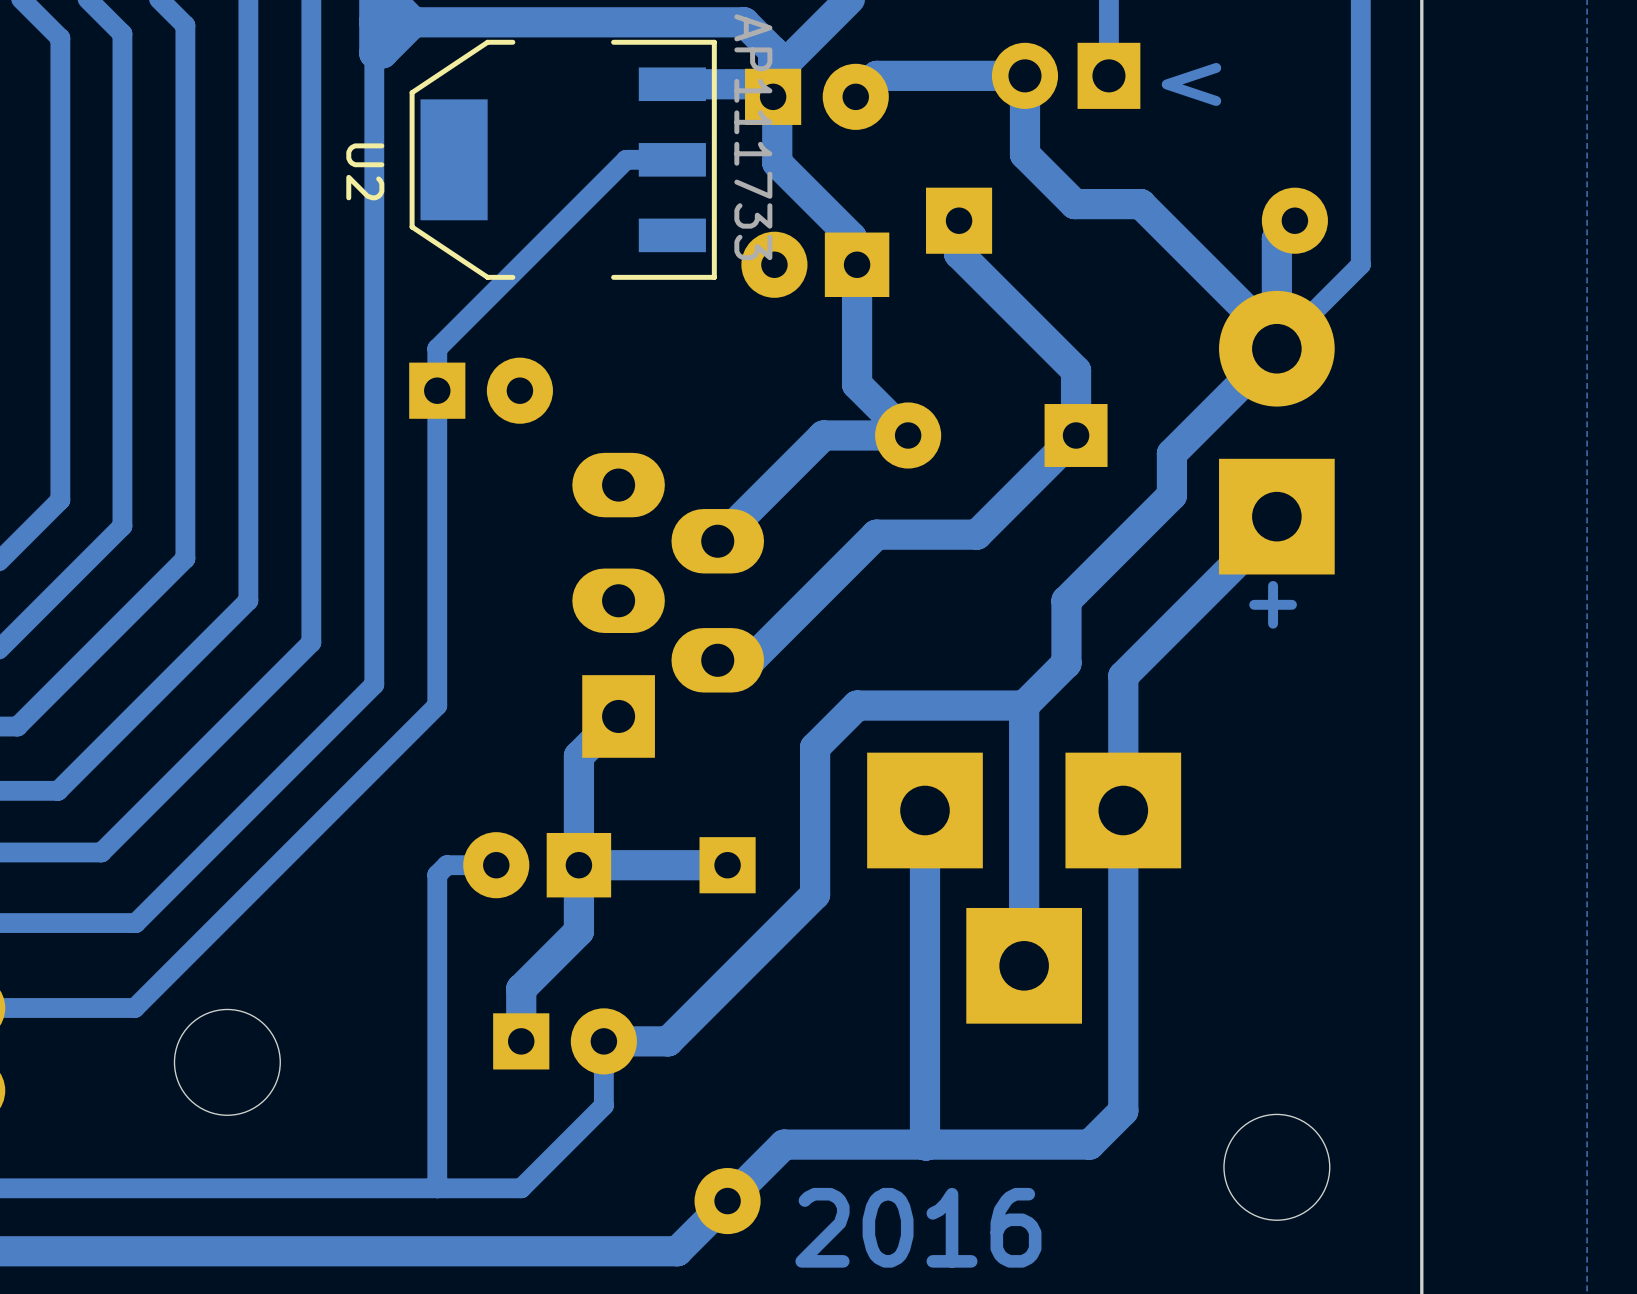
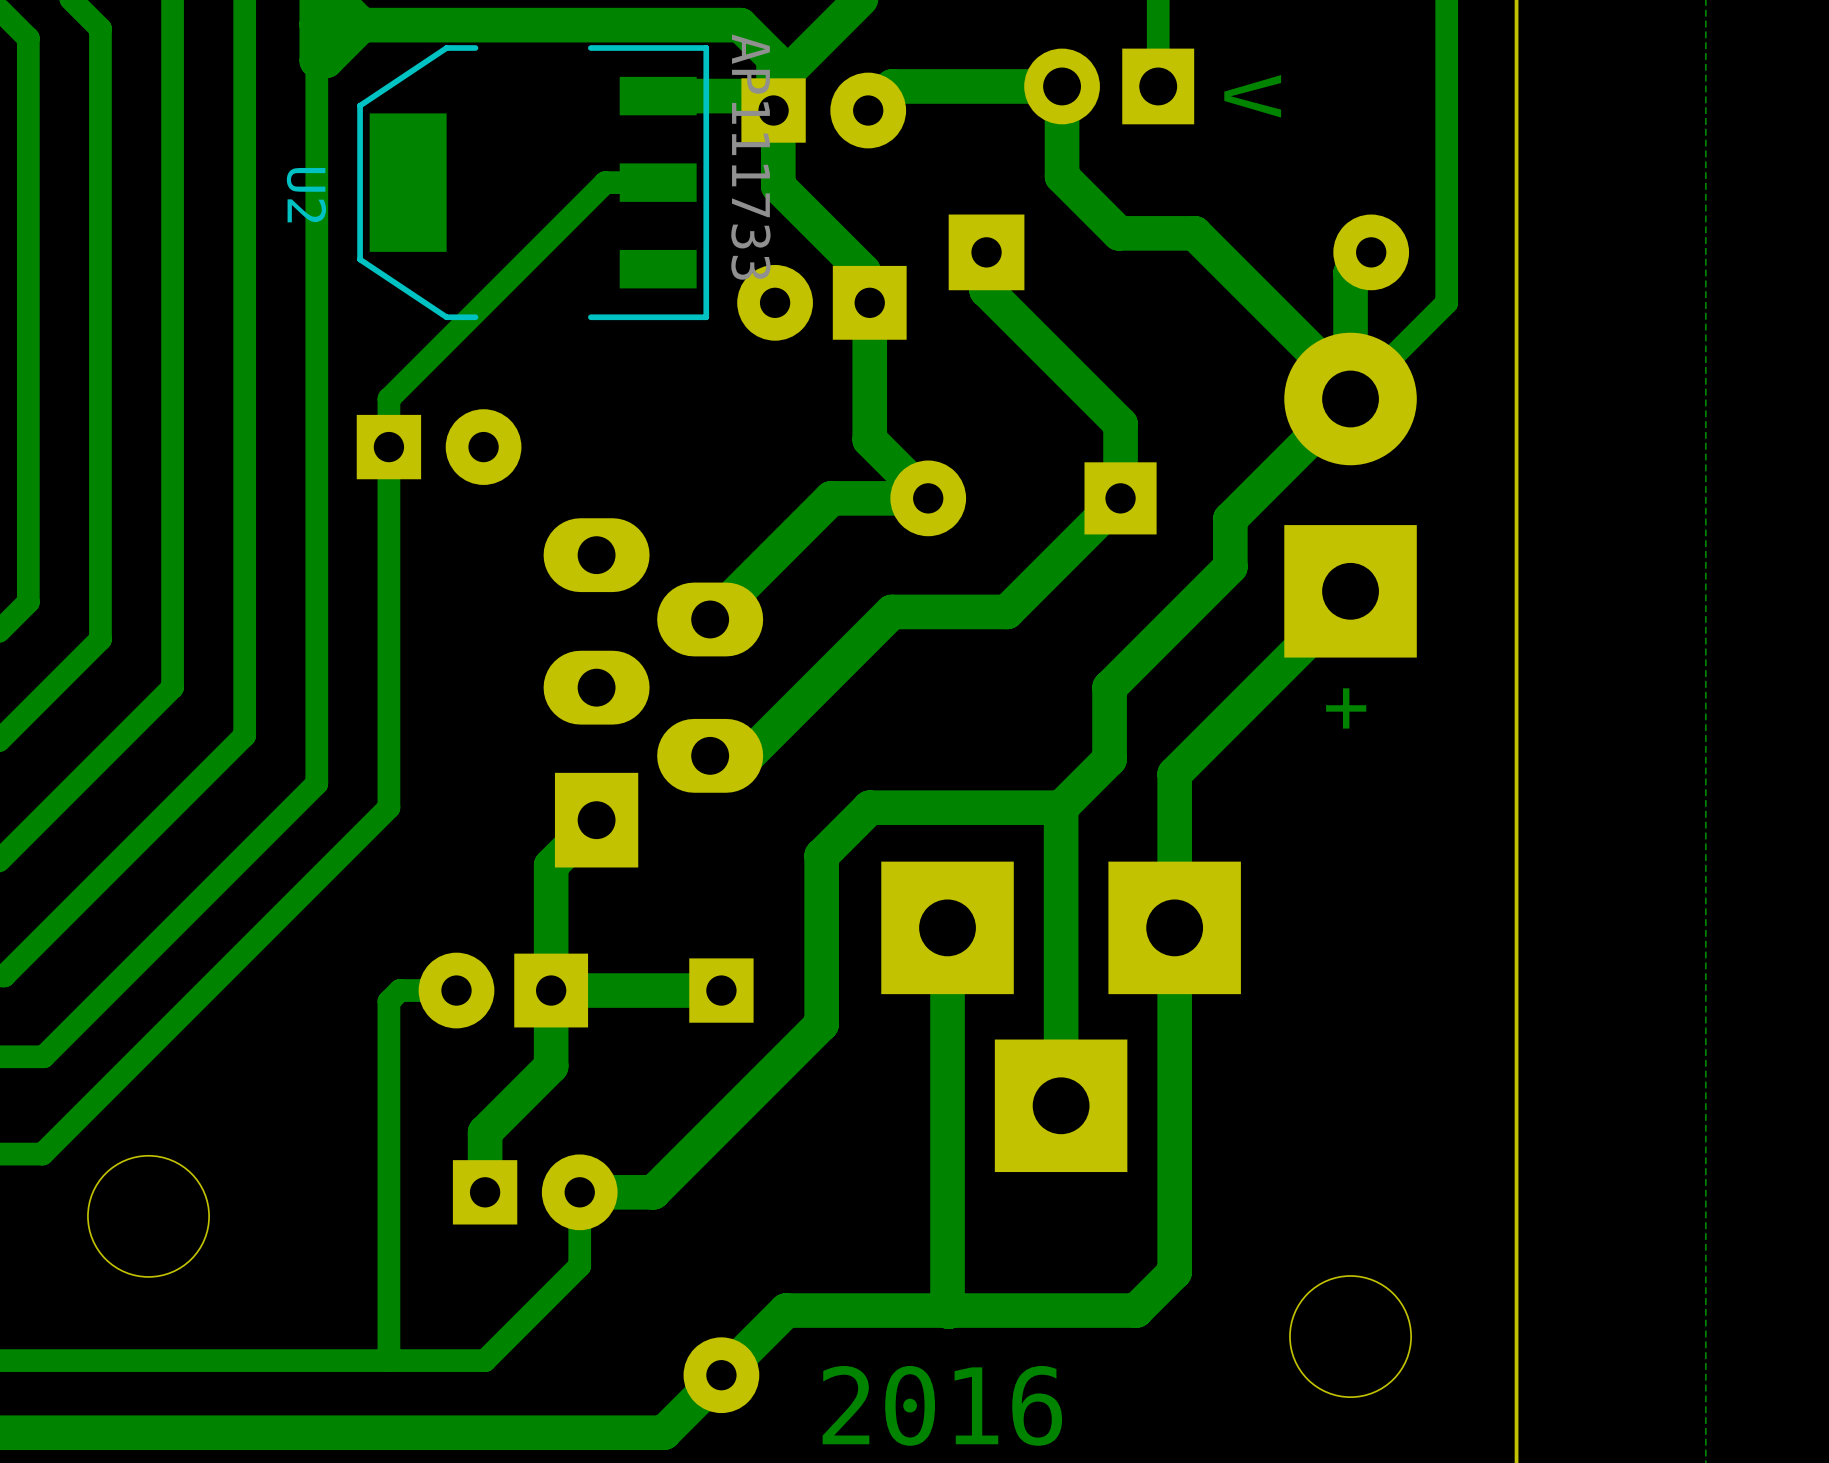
text position: + (1273, 604) -> + (1346, 708)

